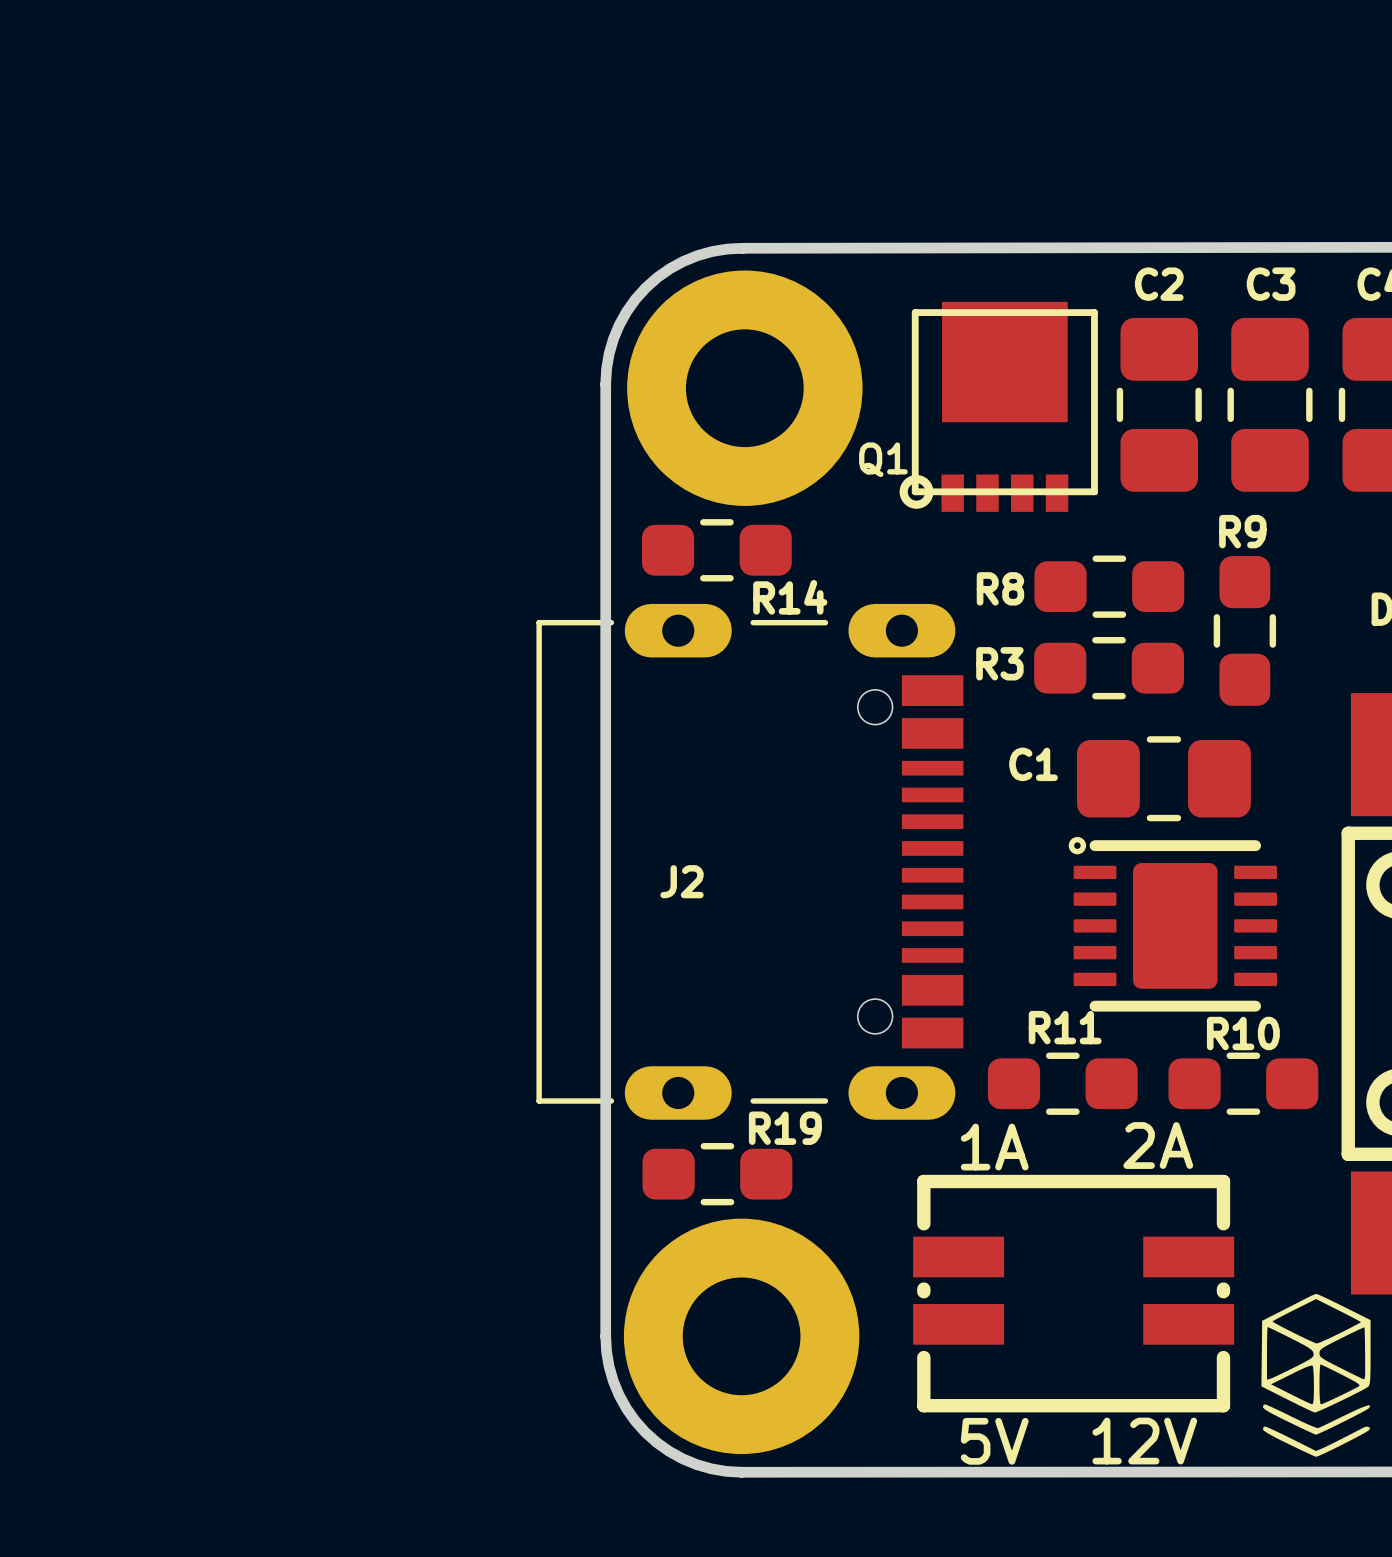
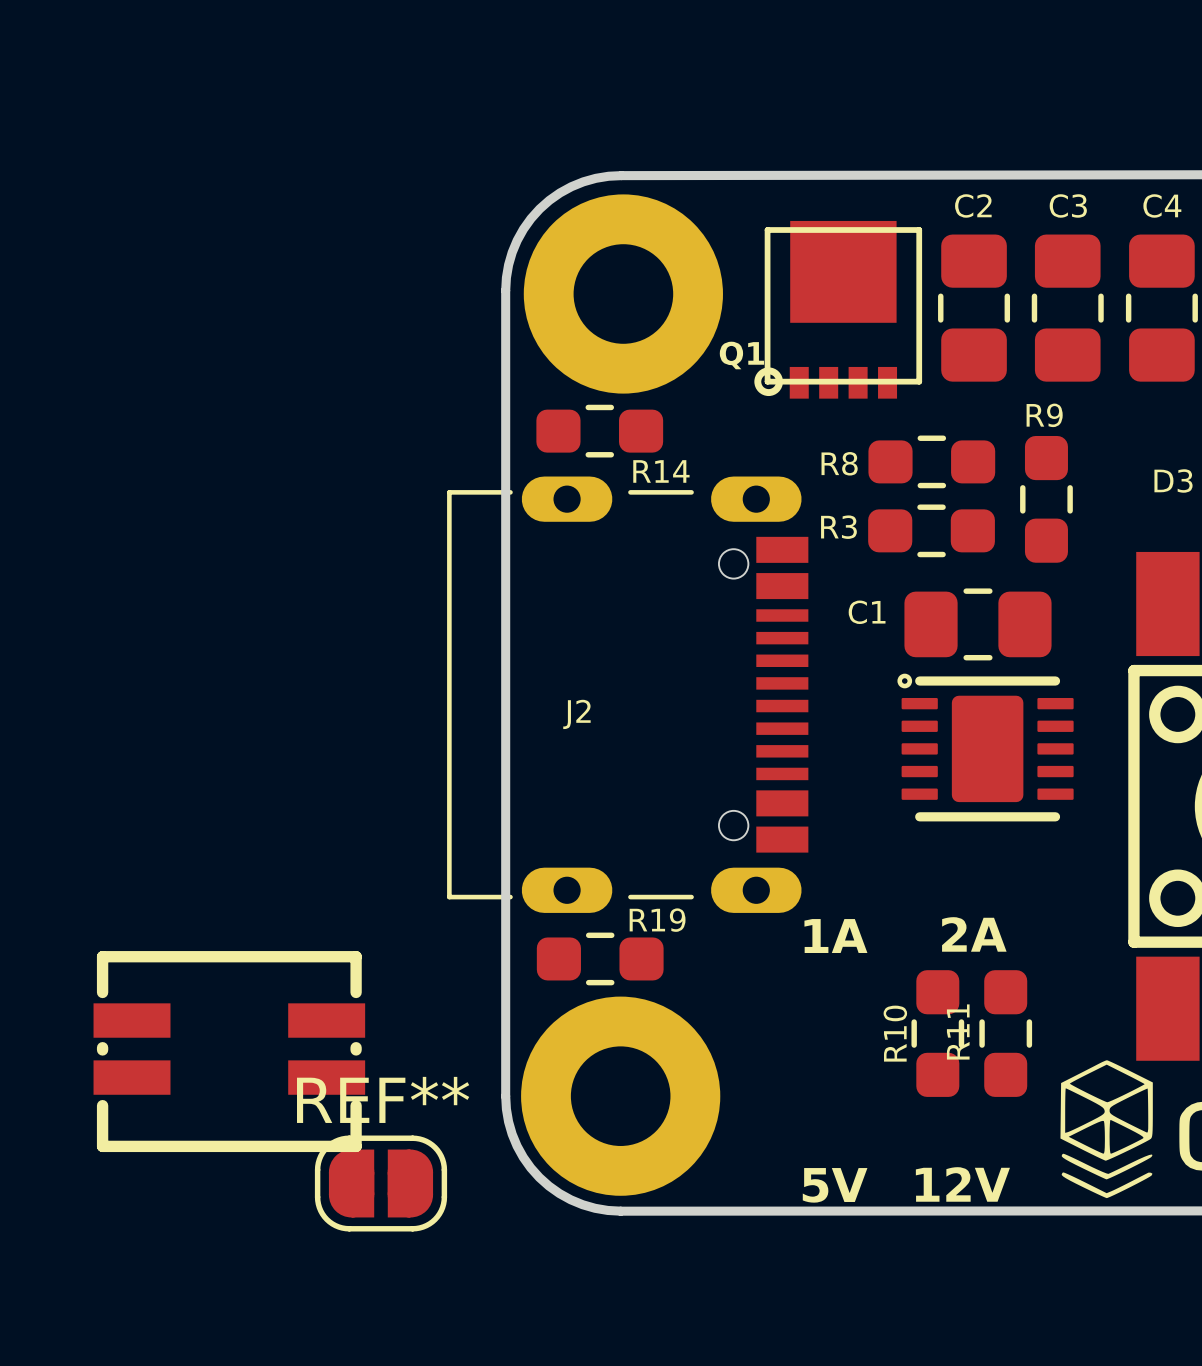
R11 rotation: 0° (1062, 1083) -> 90° clockwise (1005, 1033)
R11 position: (1062, 1083) -> (1005, 1033)
R10 rotation: 0° (1243, 1083) -> 90° clockwise (937, 1033)
R10 position: (1243, 1083) -> (937, 1033)
part position: (1073, 1293) -> (229, 1051)
REF**: none -> (380, 1183)

